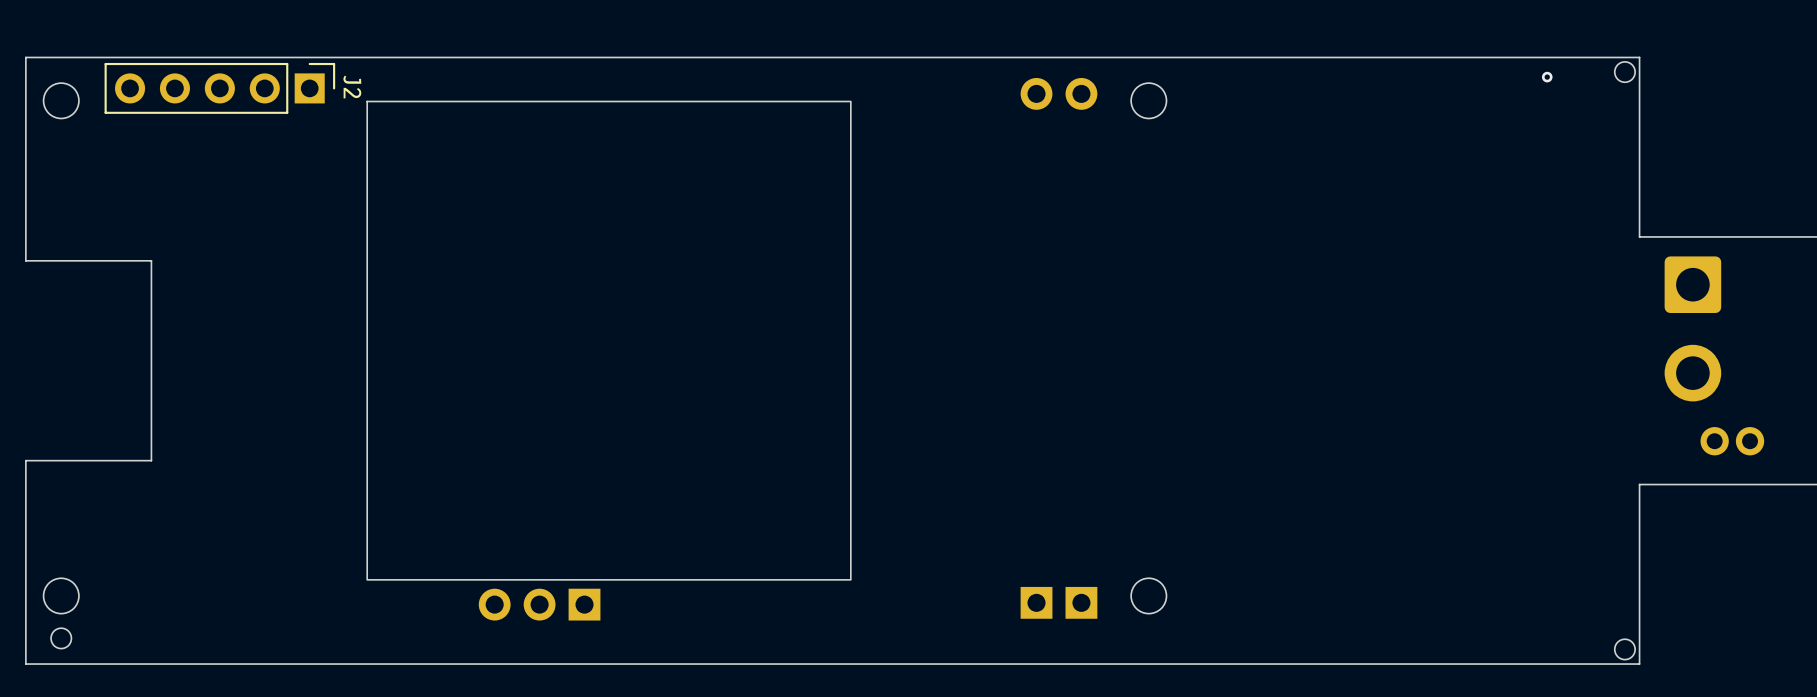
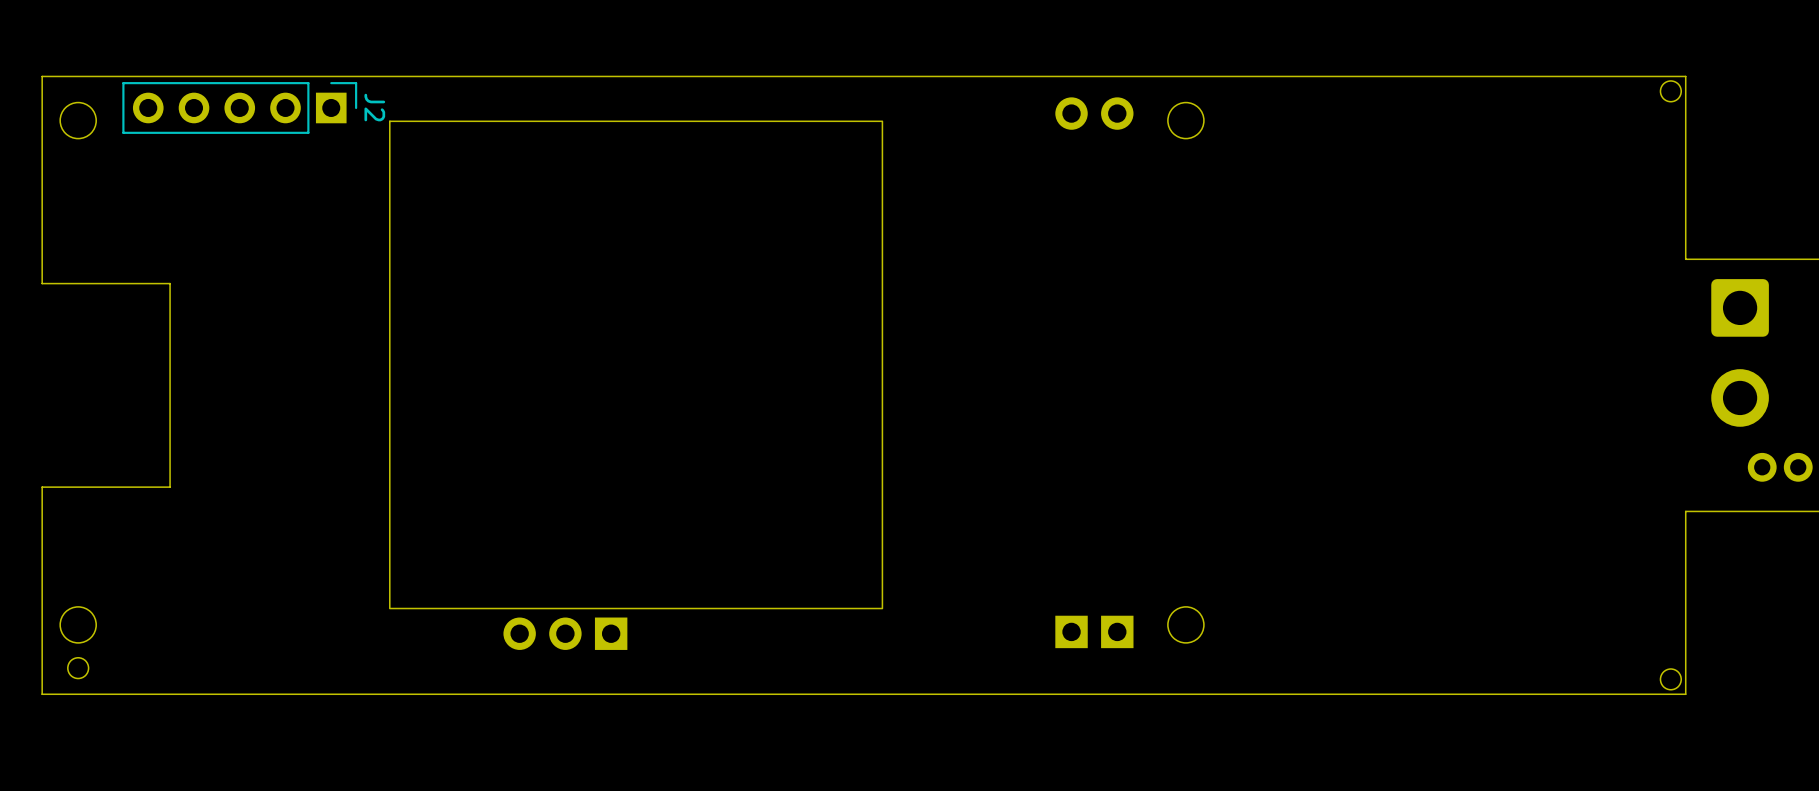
via: (1547, 77) -> none

